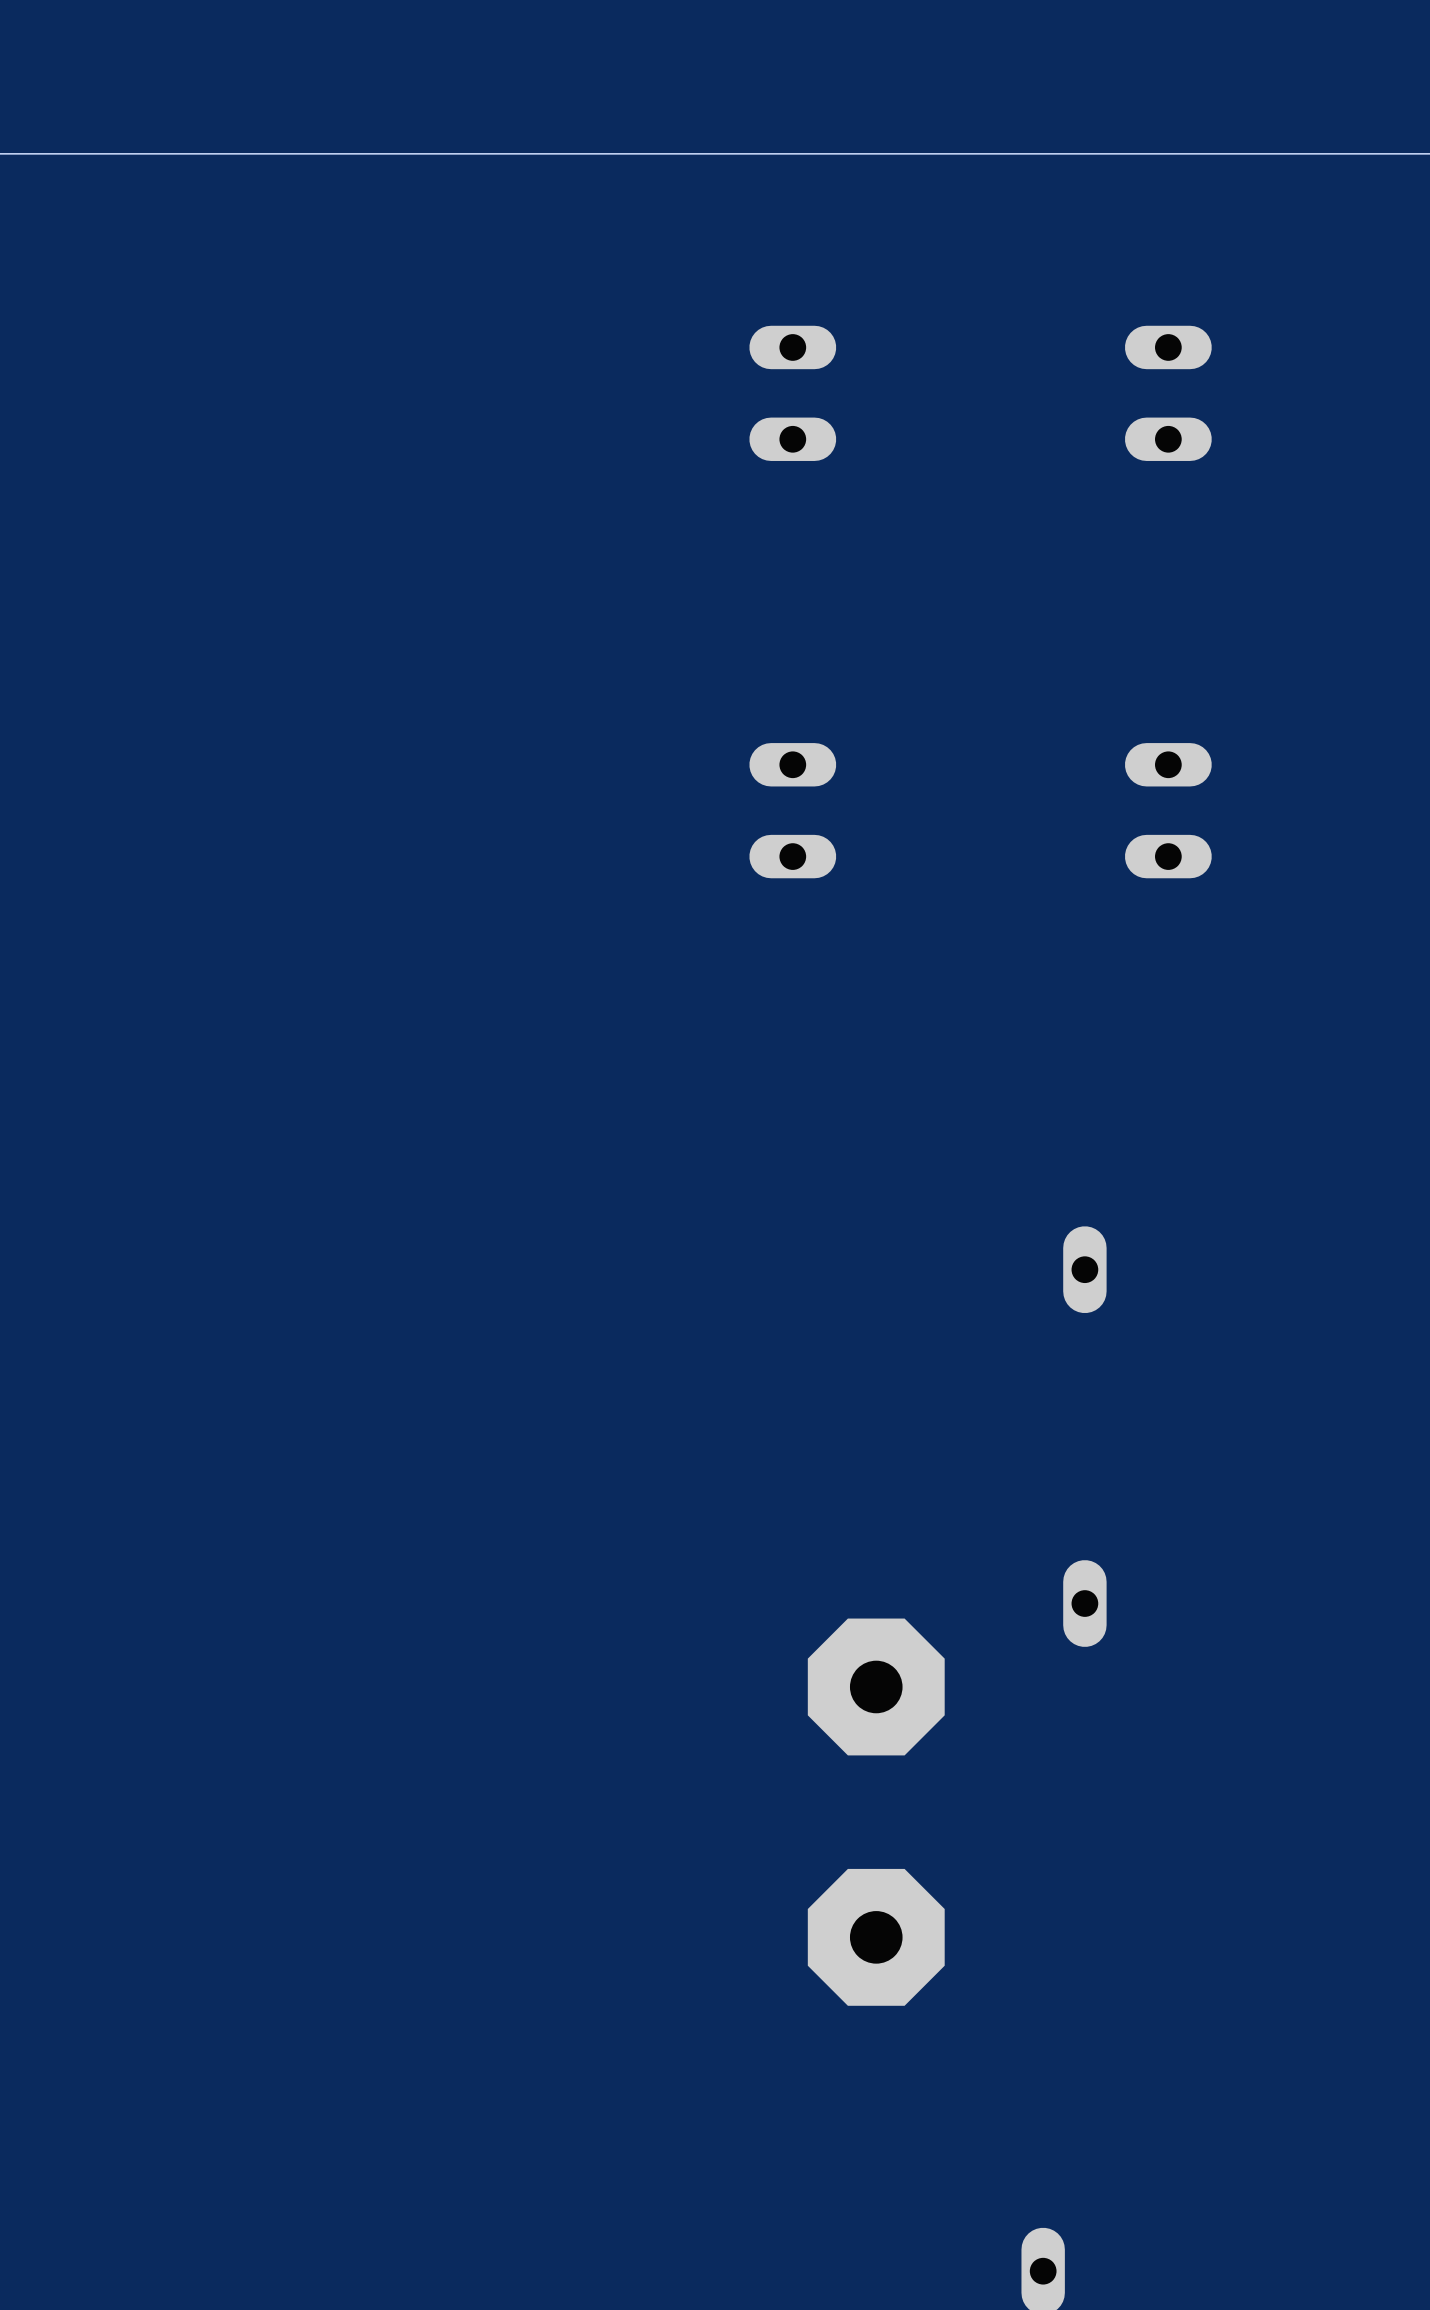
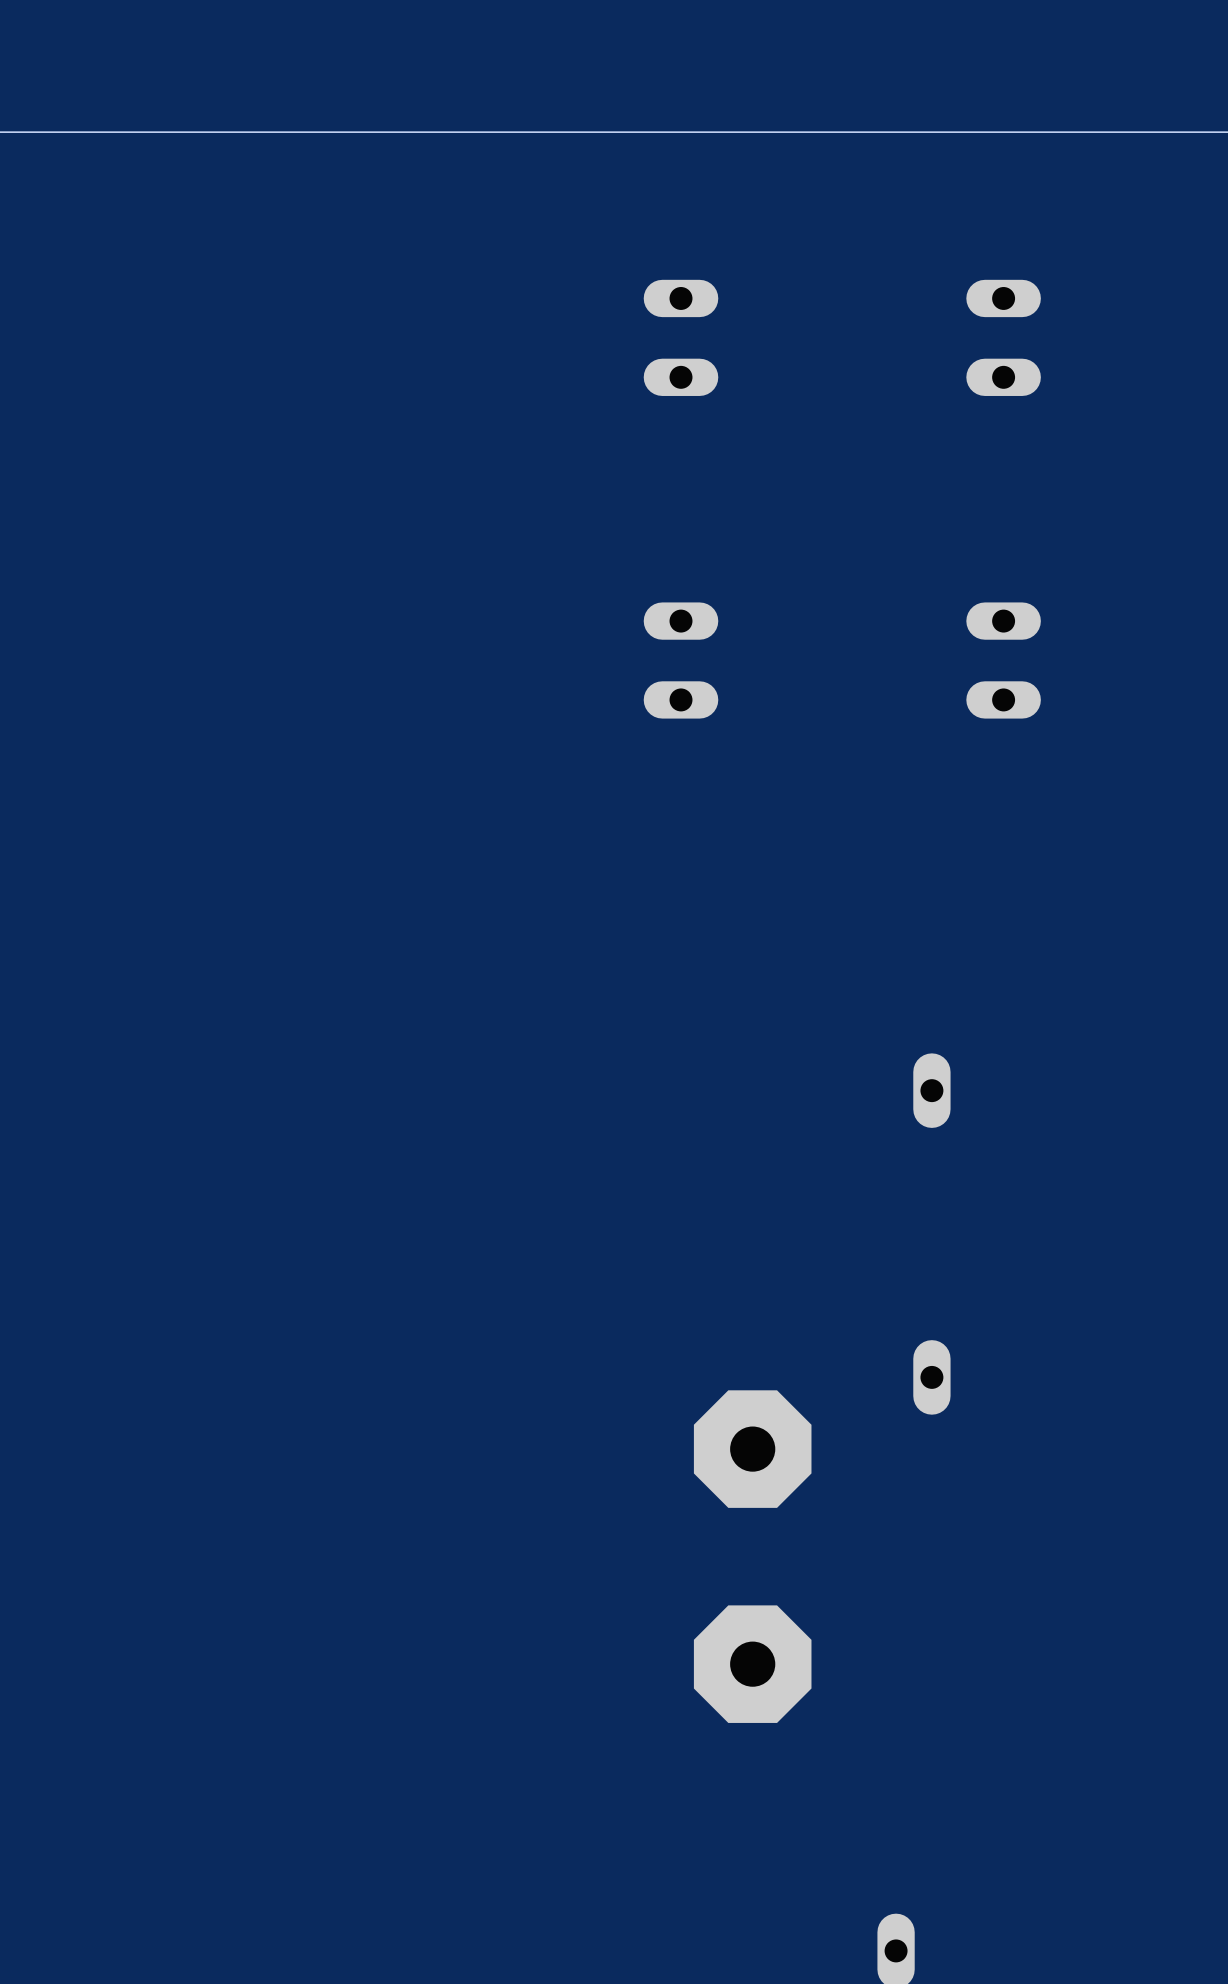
part position: (792, 810) -> (681, 660)
part position: (1168, 810) -> (1003, 660)

